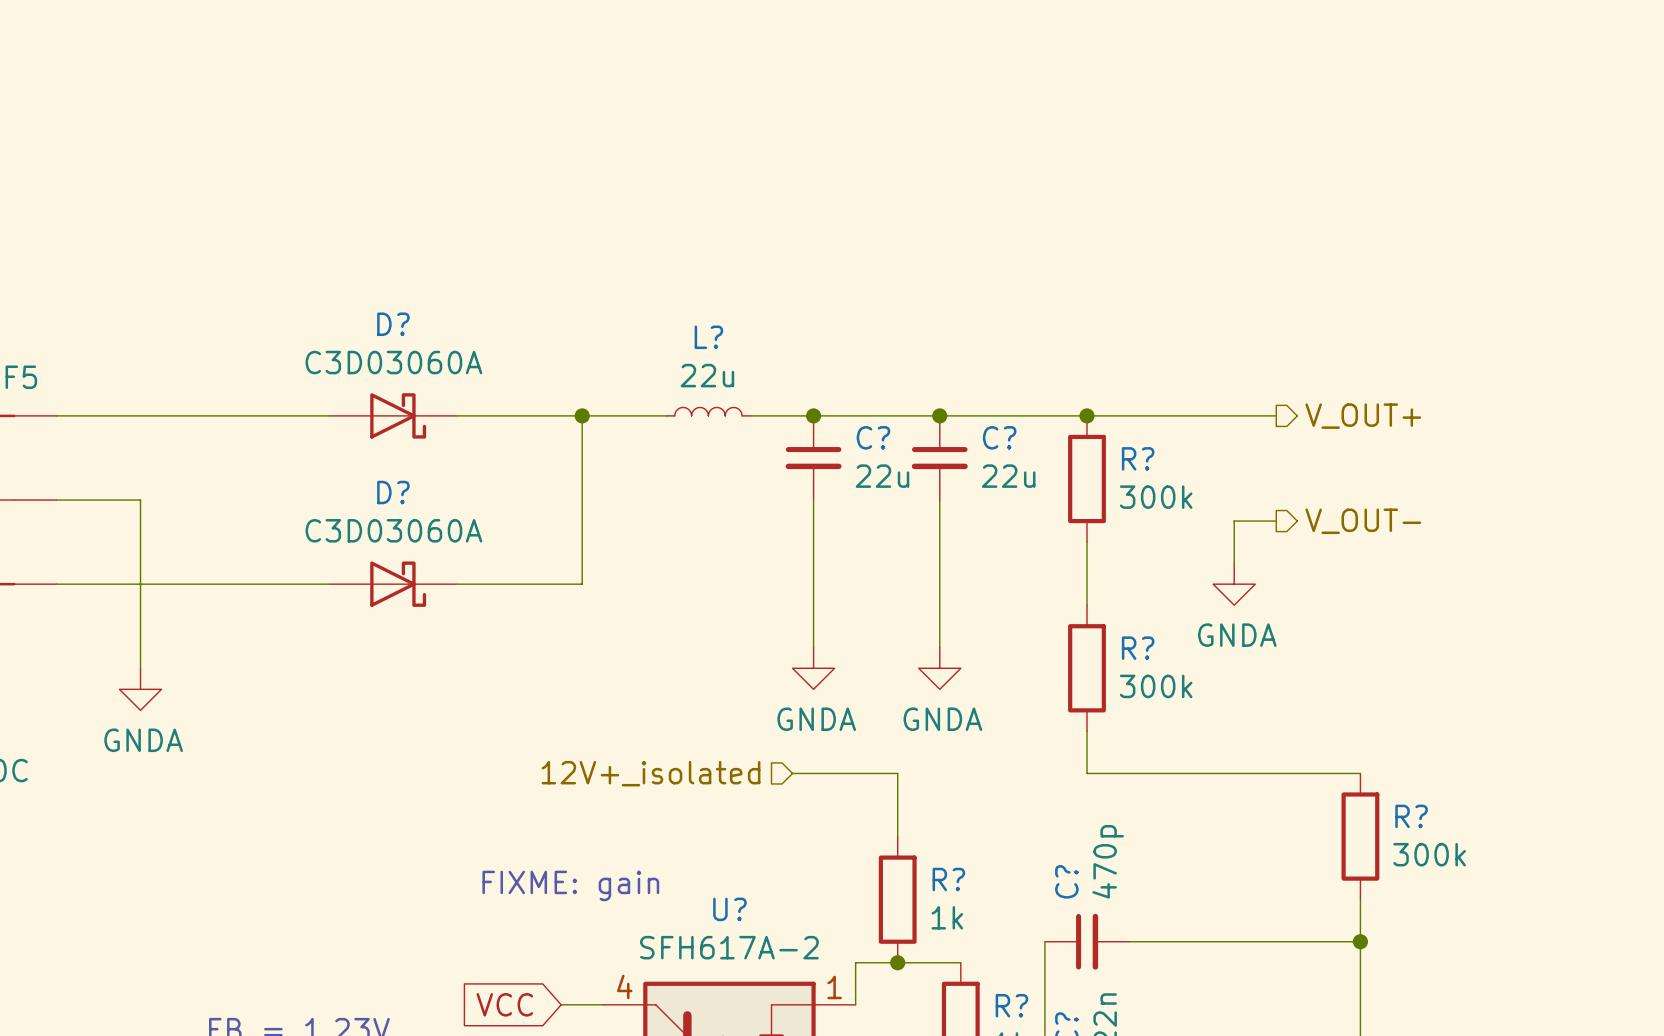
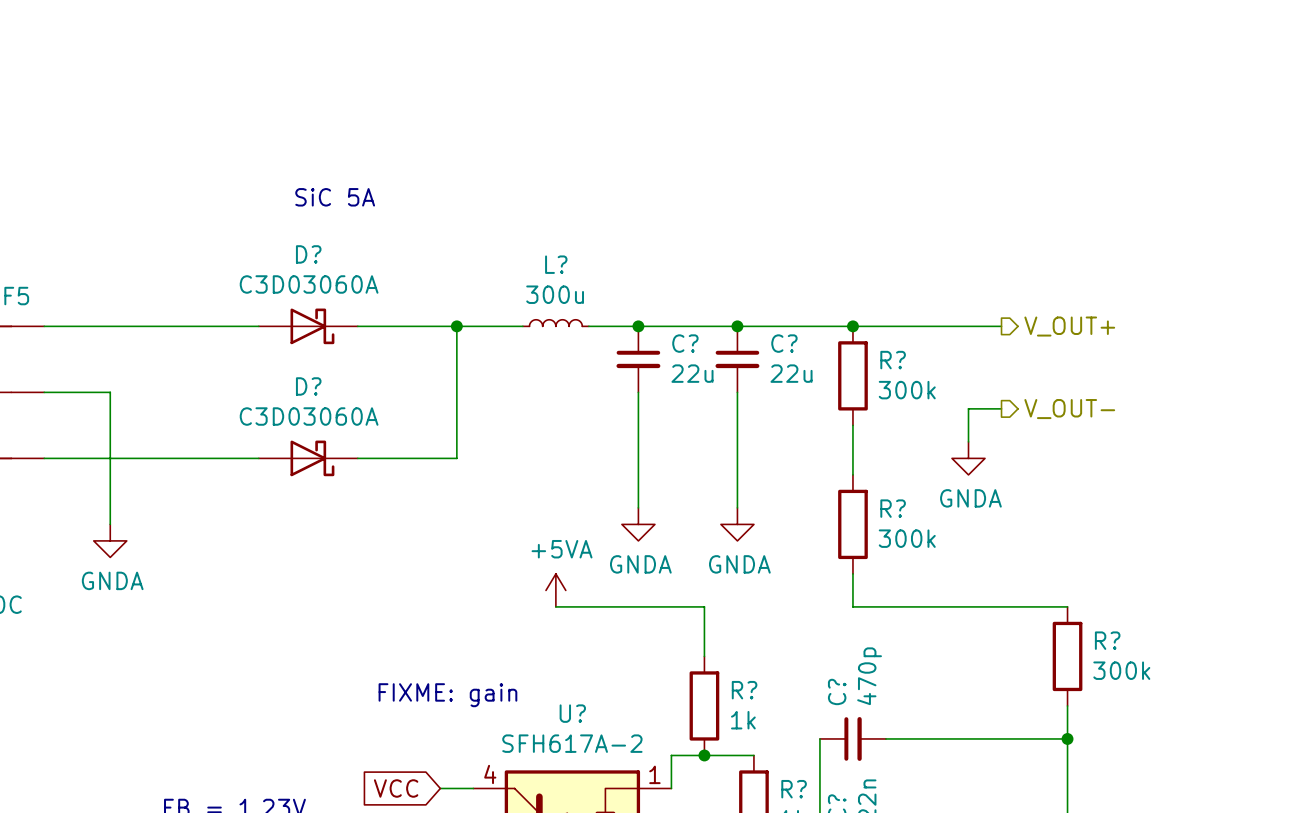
text: none -> SiC 5A (335, 197)
L? value: 22u (707, 375) -> 300u (555, 294)
power symbol: none -> +5VA (555, 590)
hierarchical label: 12V+_isolated (650, 773) -> none
wire: none -> (555, 606) (621, 606)

